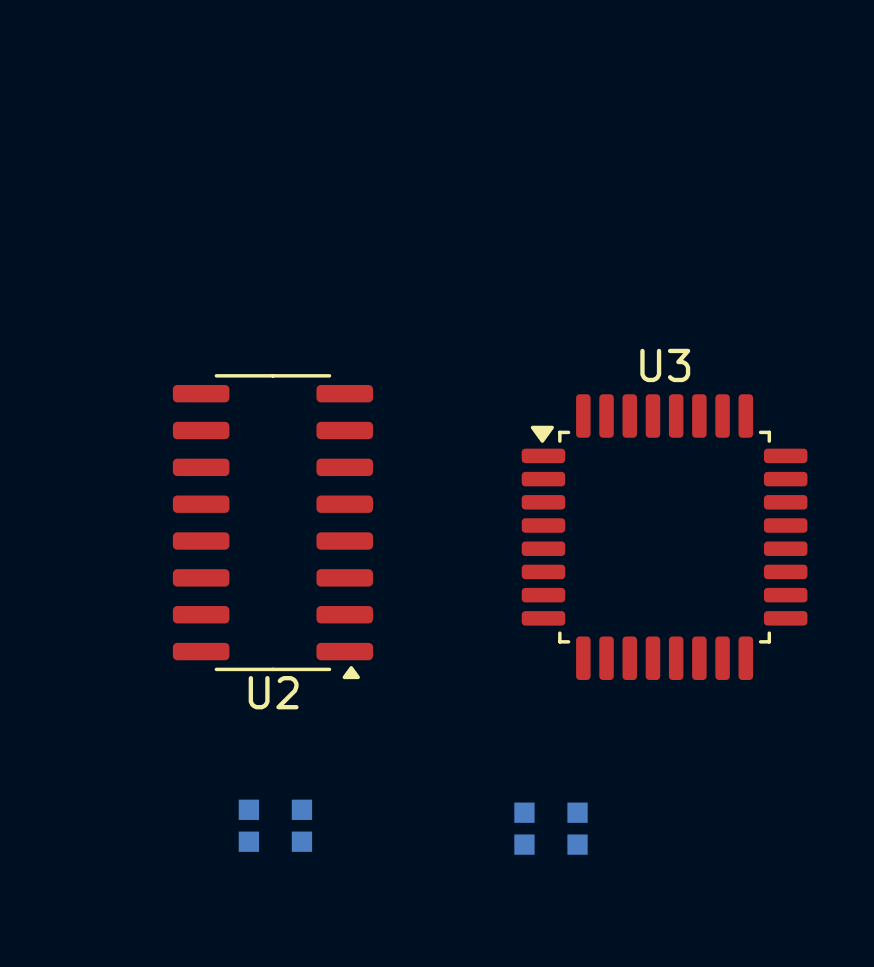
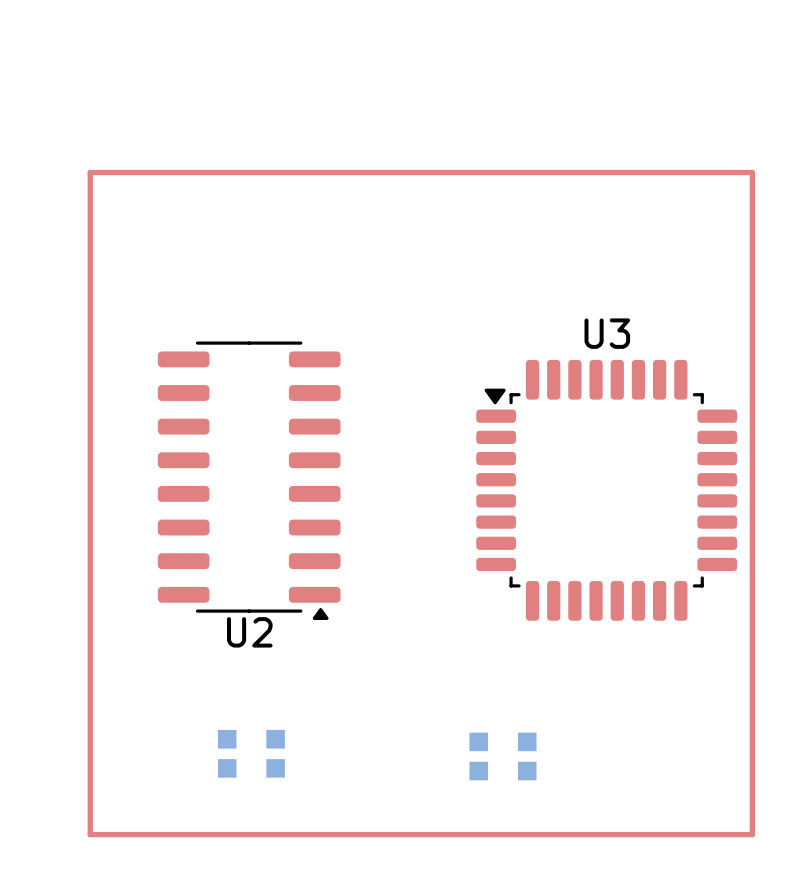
top track: none -> (90, 172) (752, 172) (752, 834) (90, 834) (90, 172)

